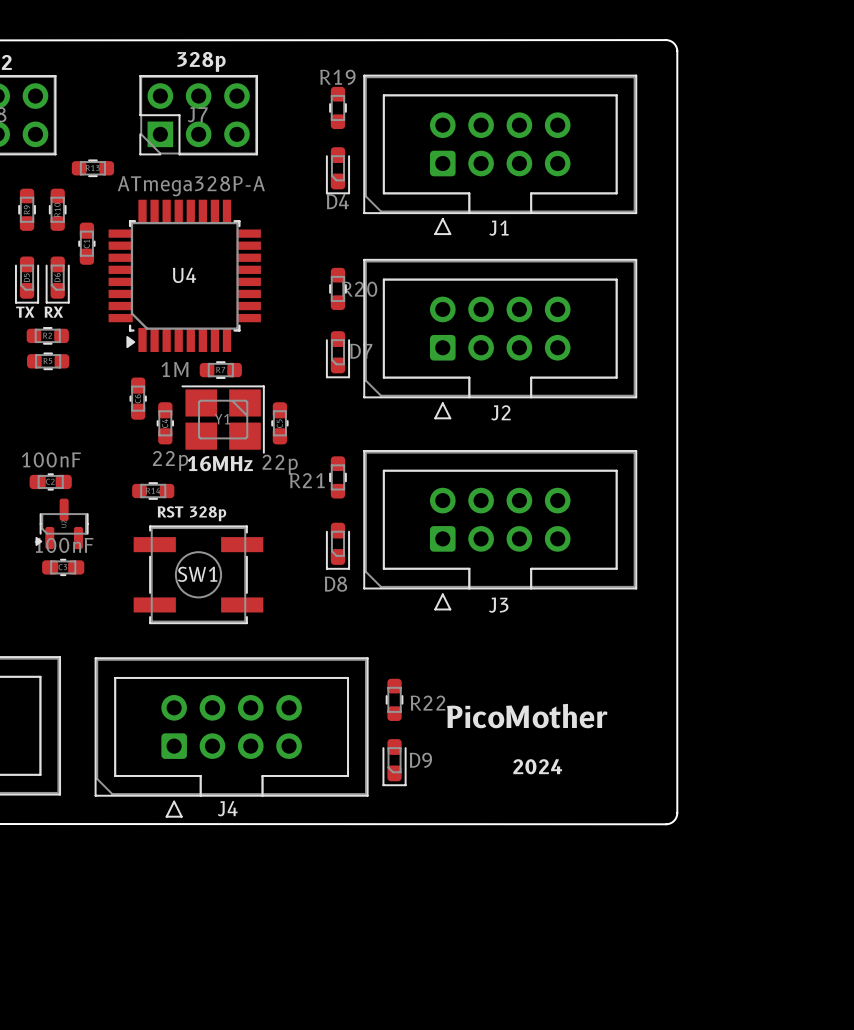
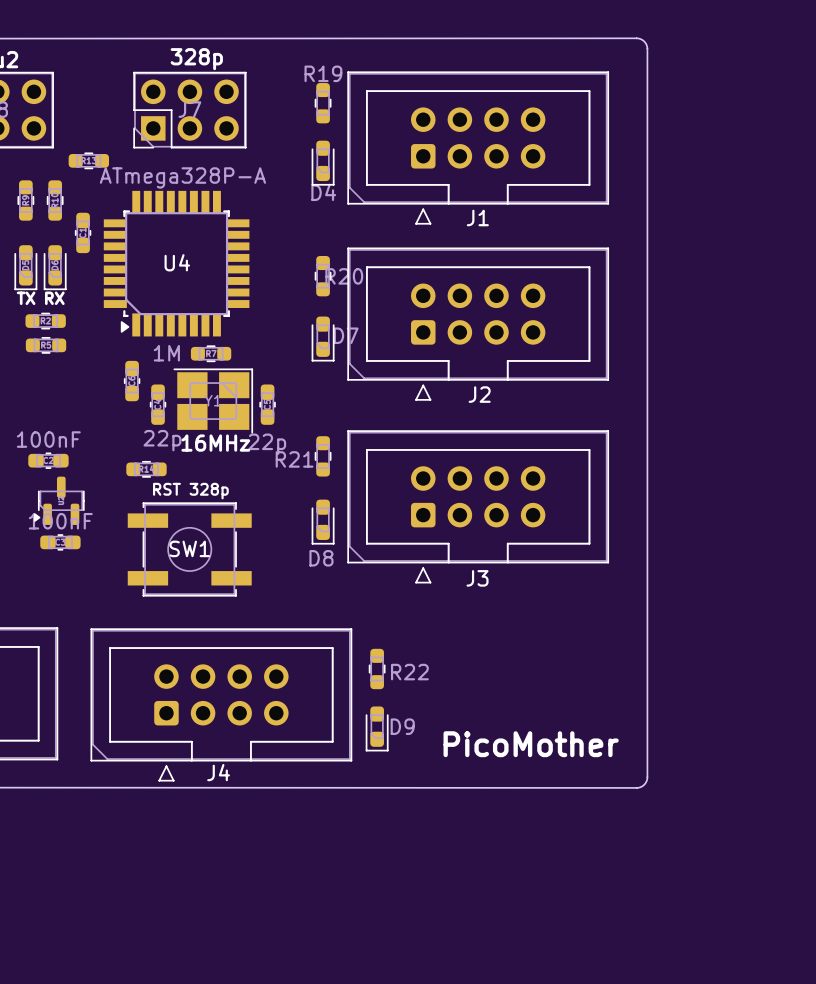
text position: PicoMother (527, 716) -> PicoMother (531, 744)
text: 2024 (537, 766) -> none

